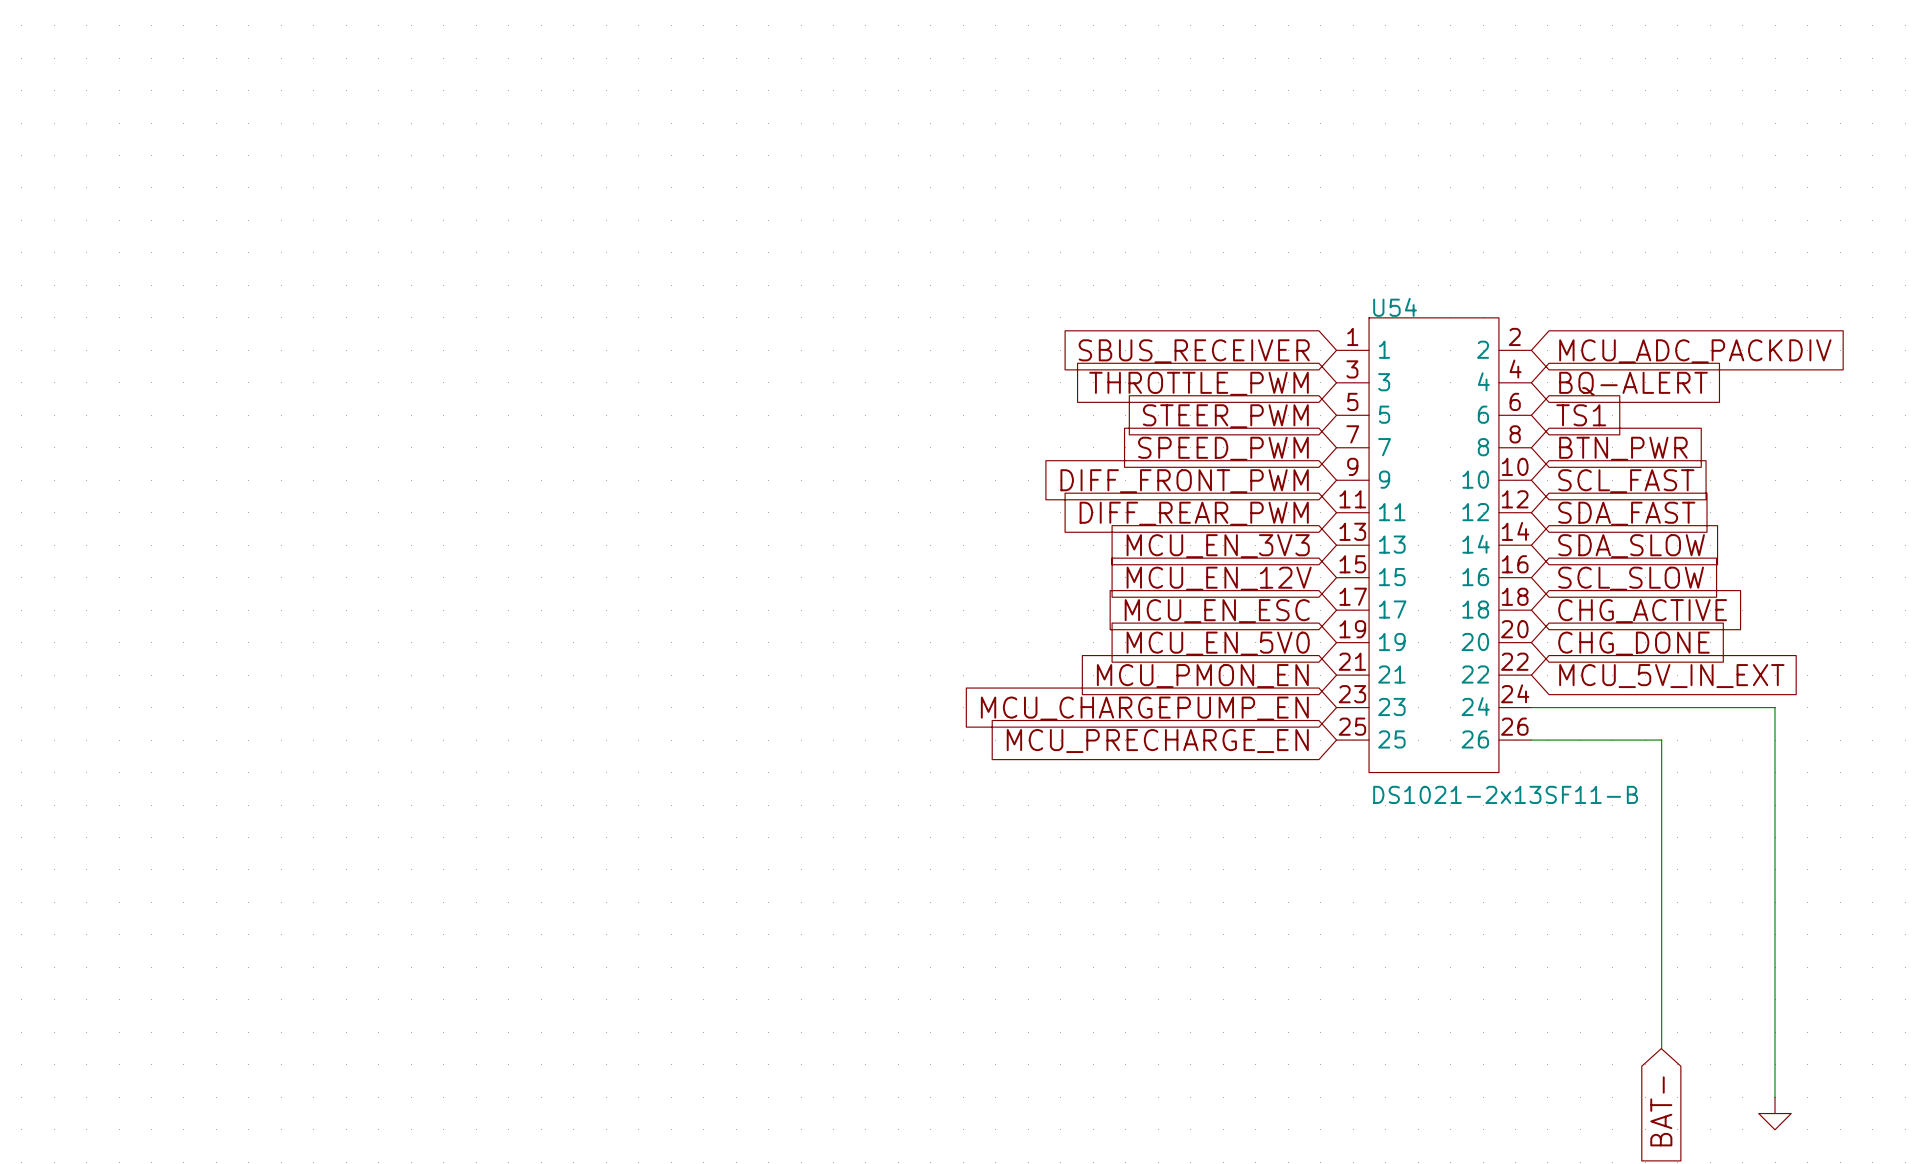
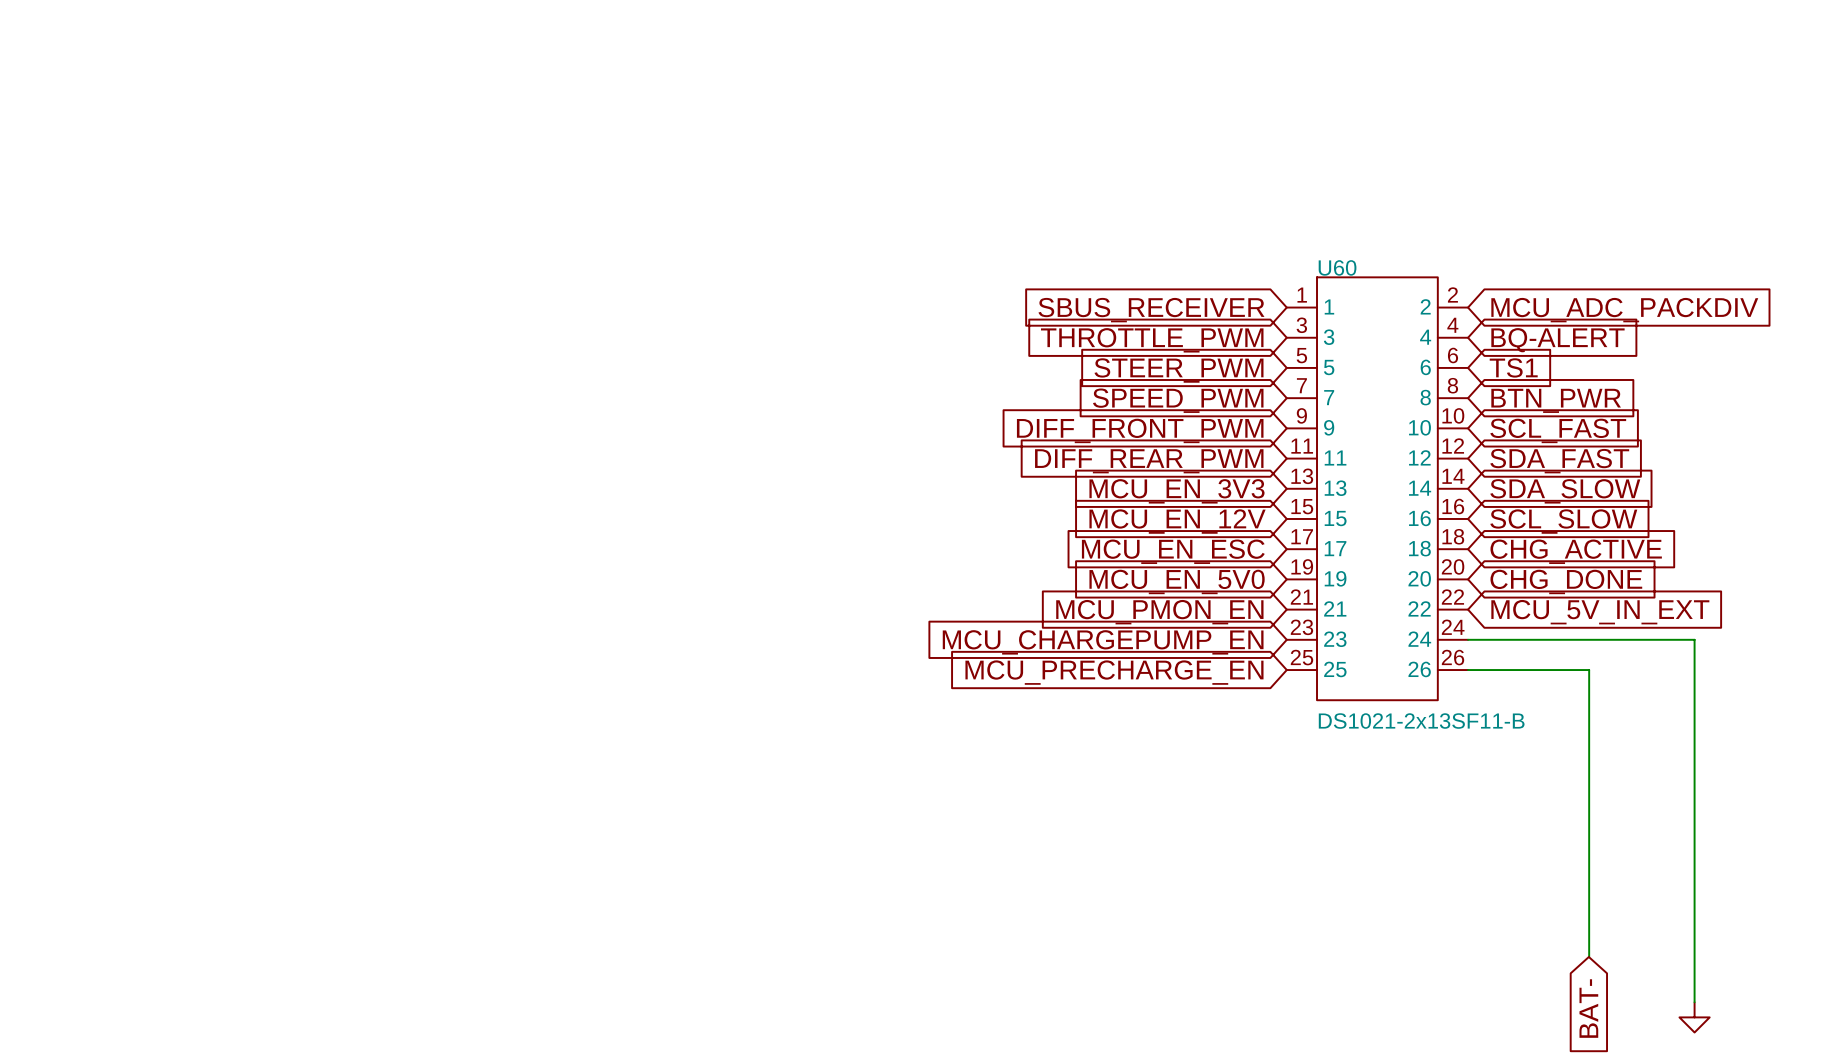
U54 name: U54 (1395, 307) -> U60 (1337, 267)

